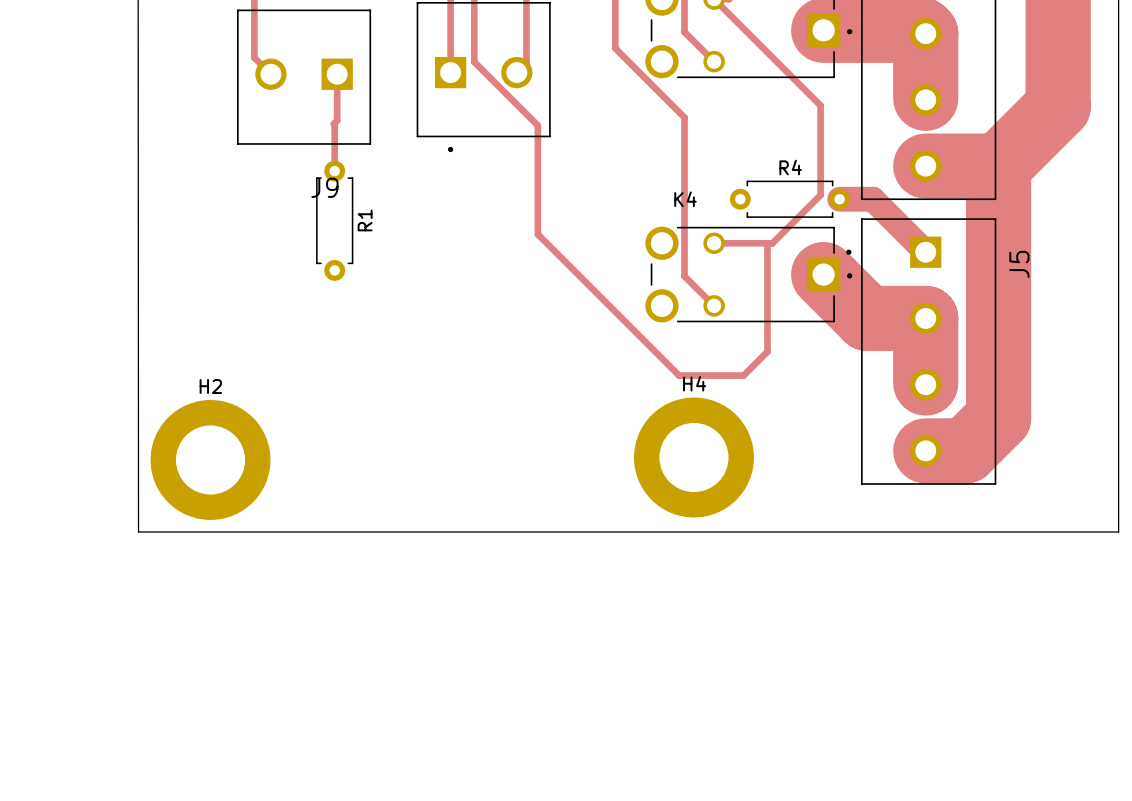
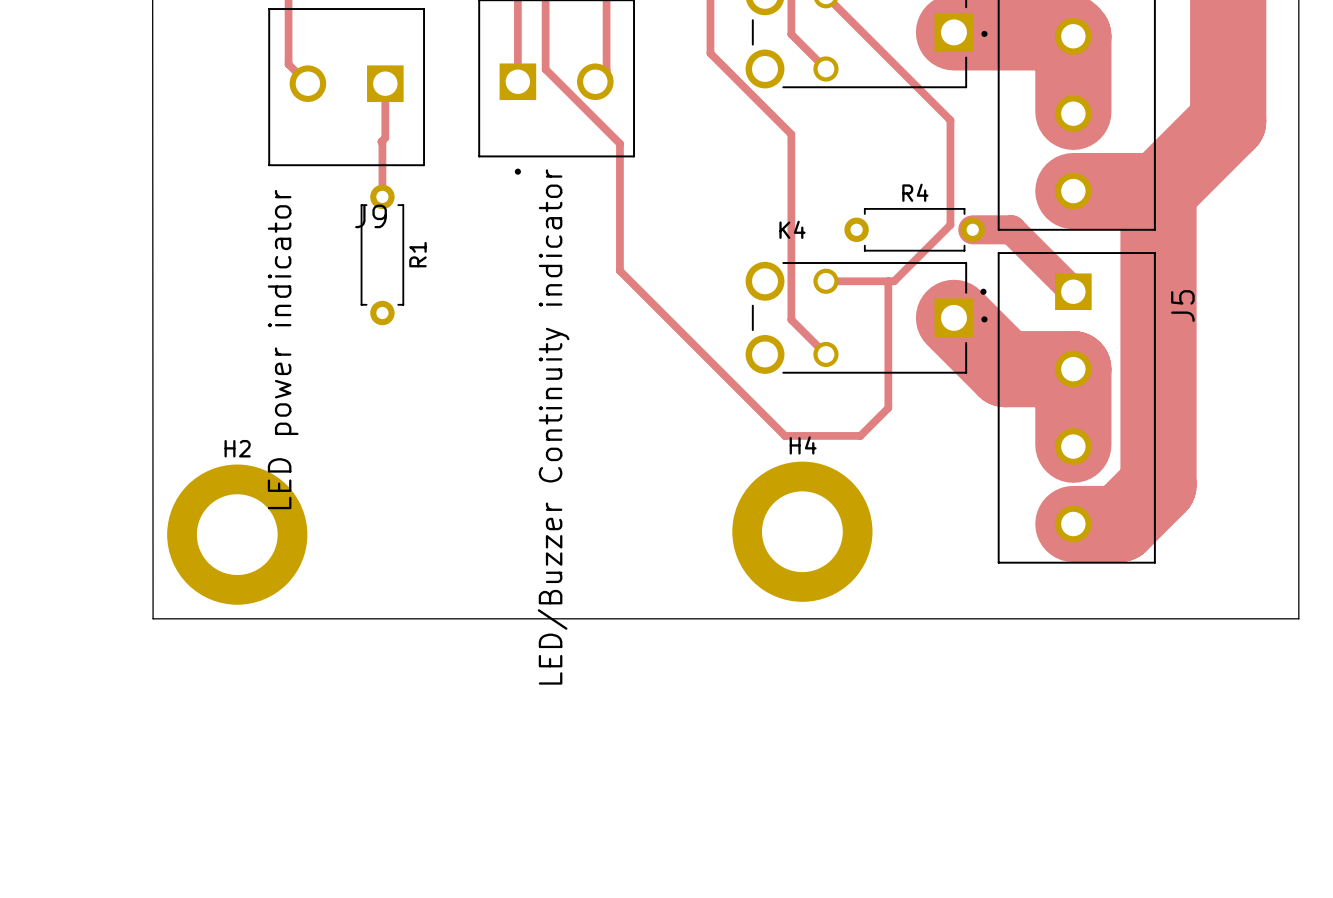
J9 value: none -> LED power indicator (283, 349)
part value: none -> LED/Buzzer Continuity indicator (553, 426)

